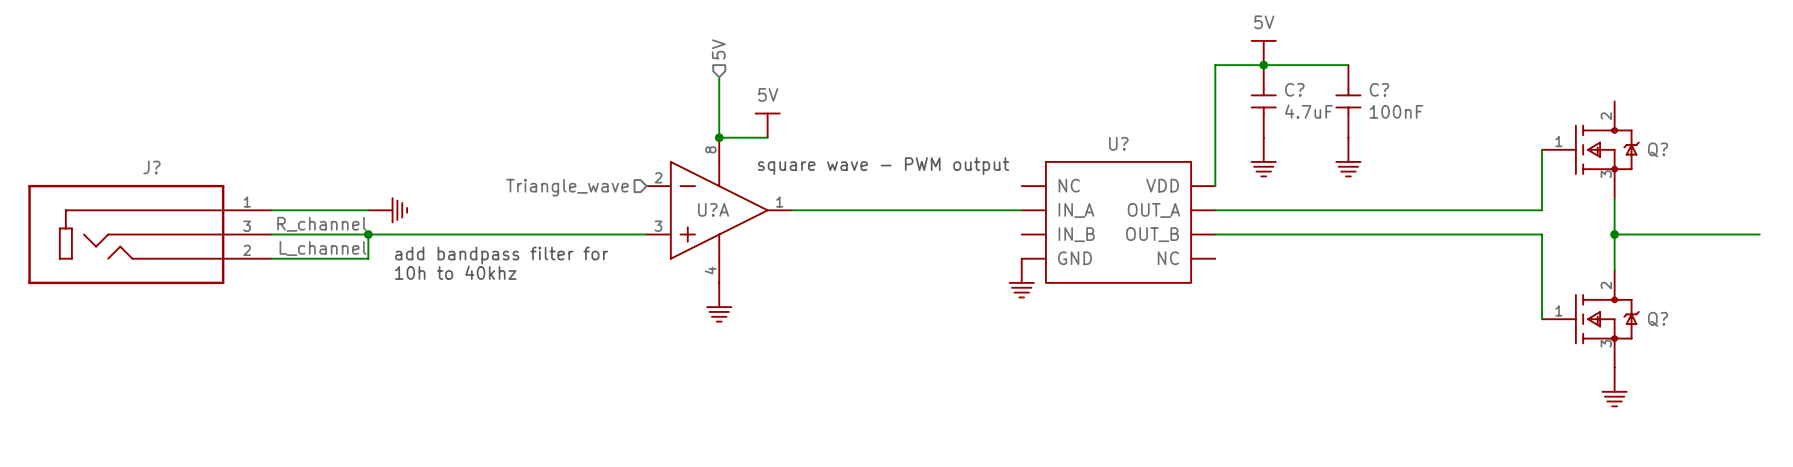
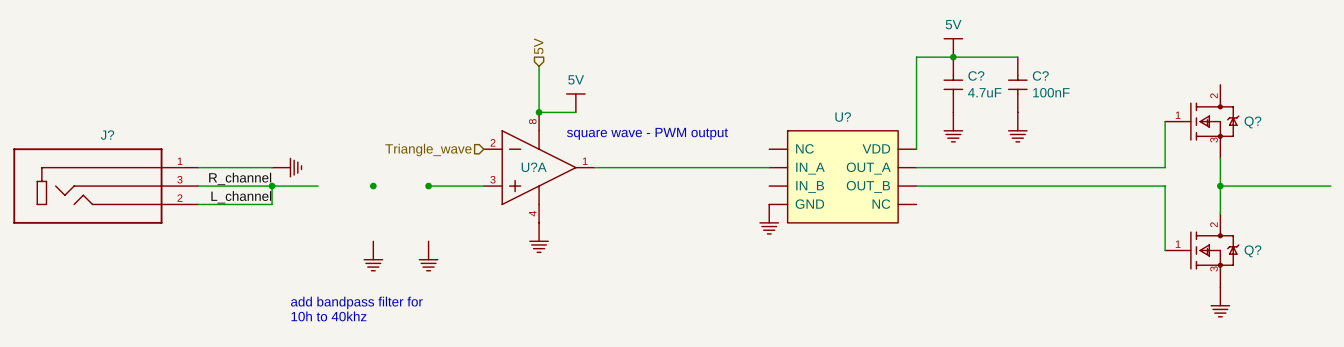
wire: (428, 234) (574, 234) -> none
junction: none -> (373, 186)
junction: none -> (428, 186)
text position: add bandpass filter for (501, 255) -> add bandpass filter for (356, 302)
text position: 10h to 40khz (455, 272) -> 10h to 40khz (328, 316)
power symbol: none -> (373, 256)
power symbol: none -> (428, 256)

